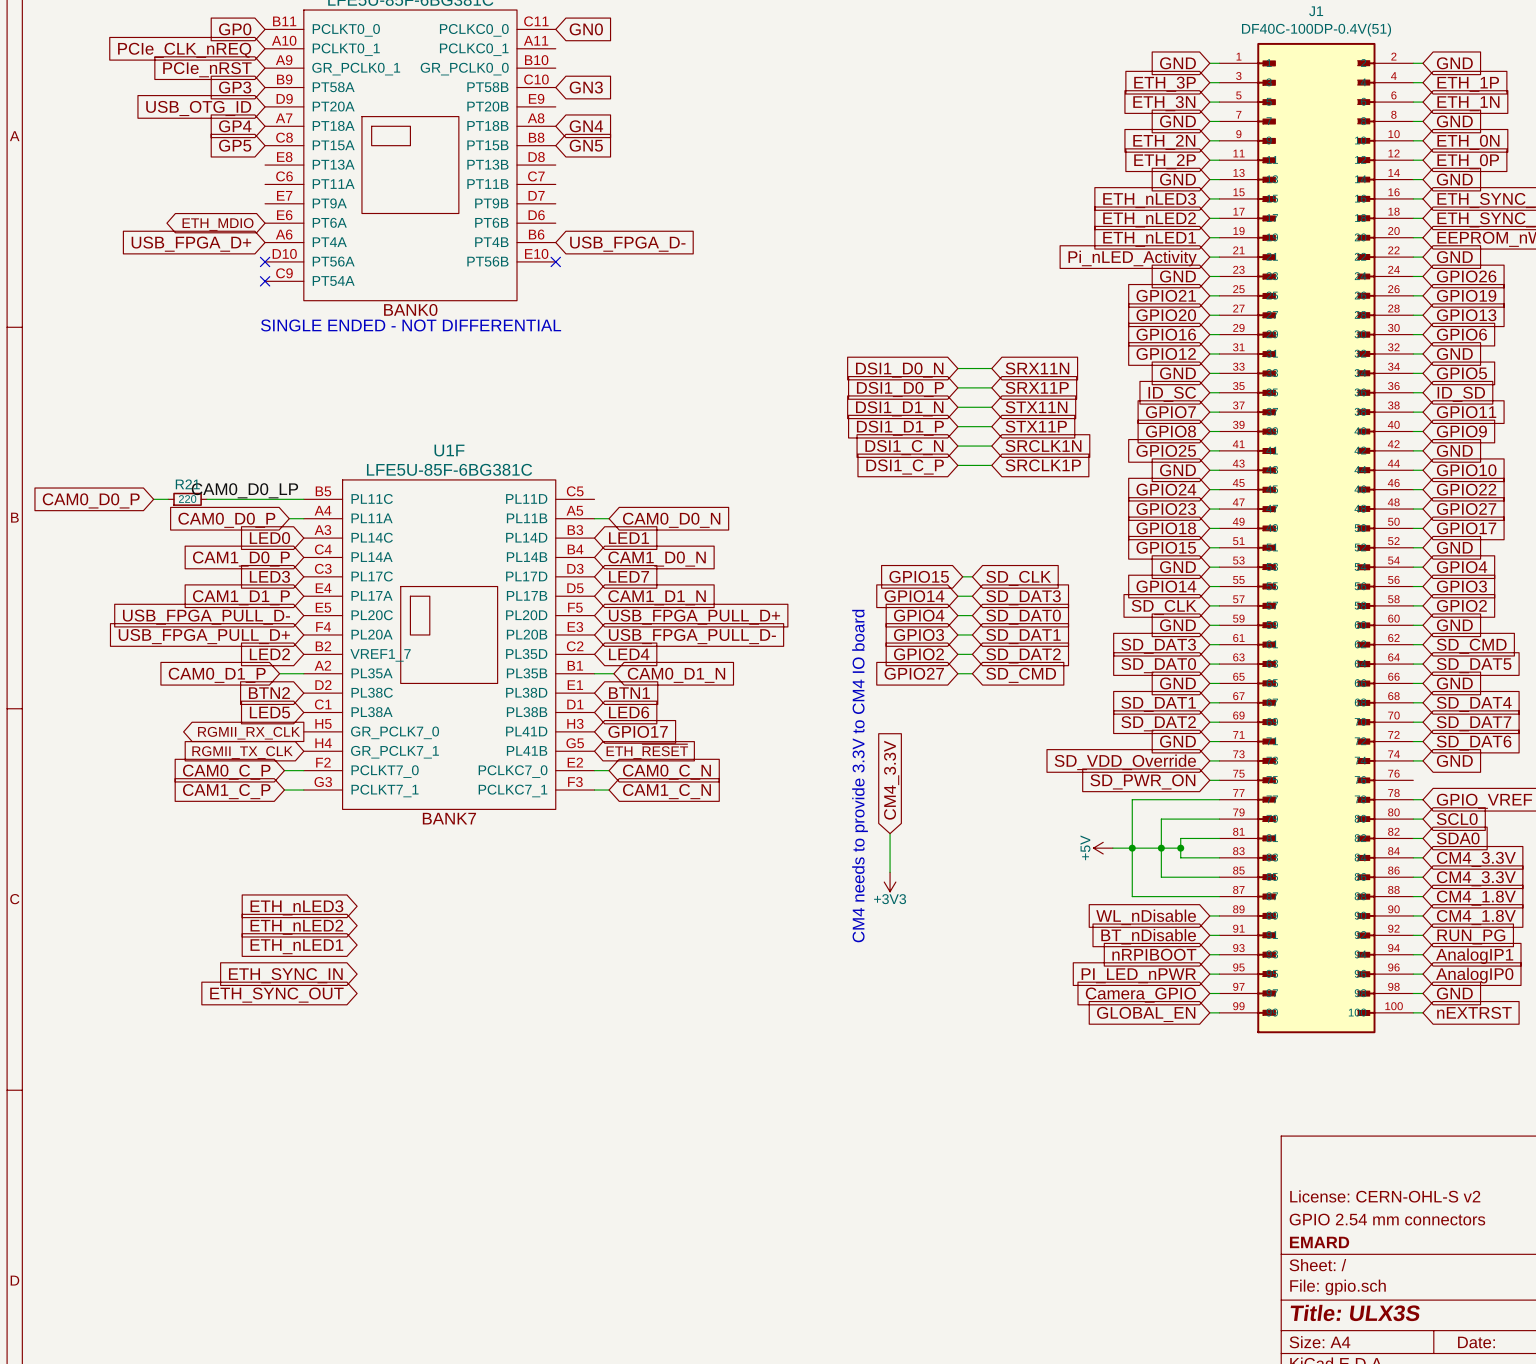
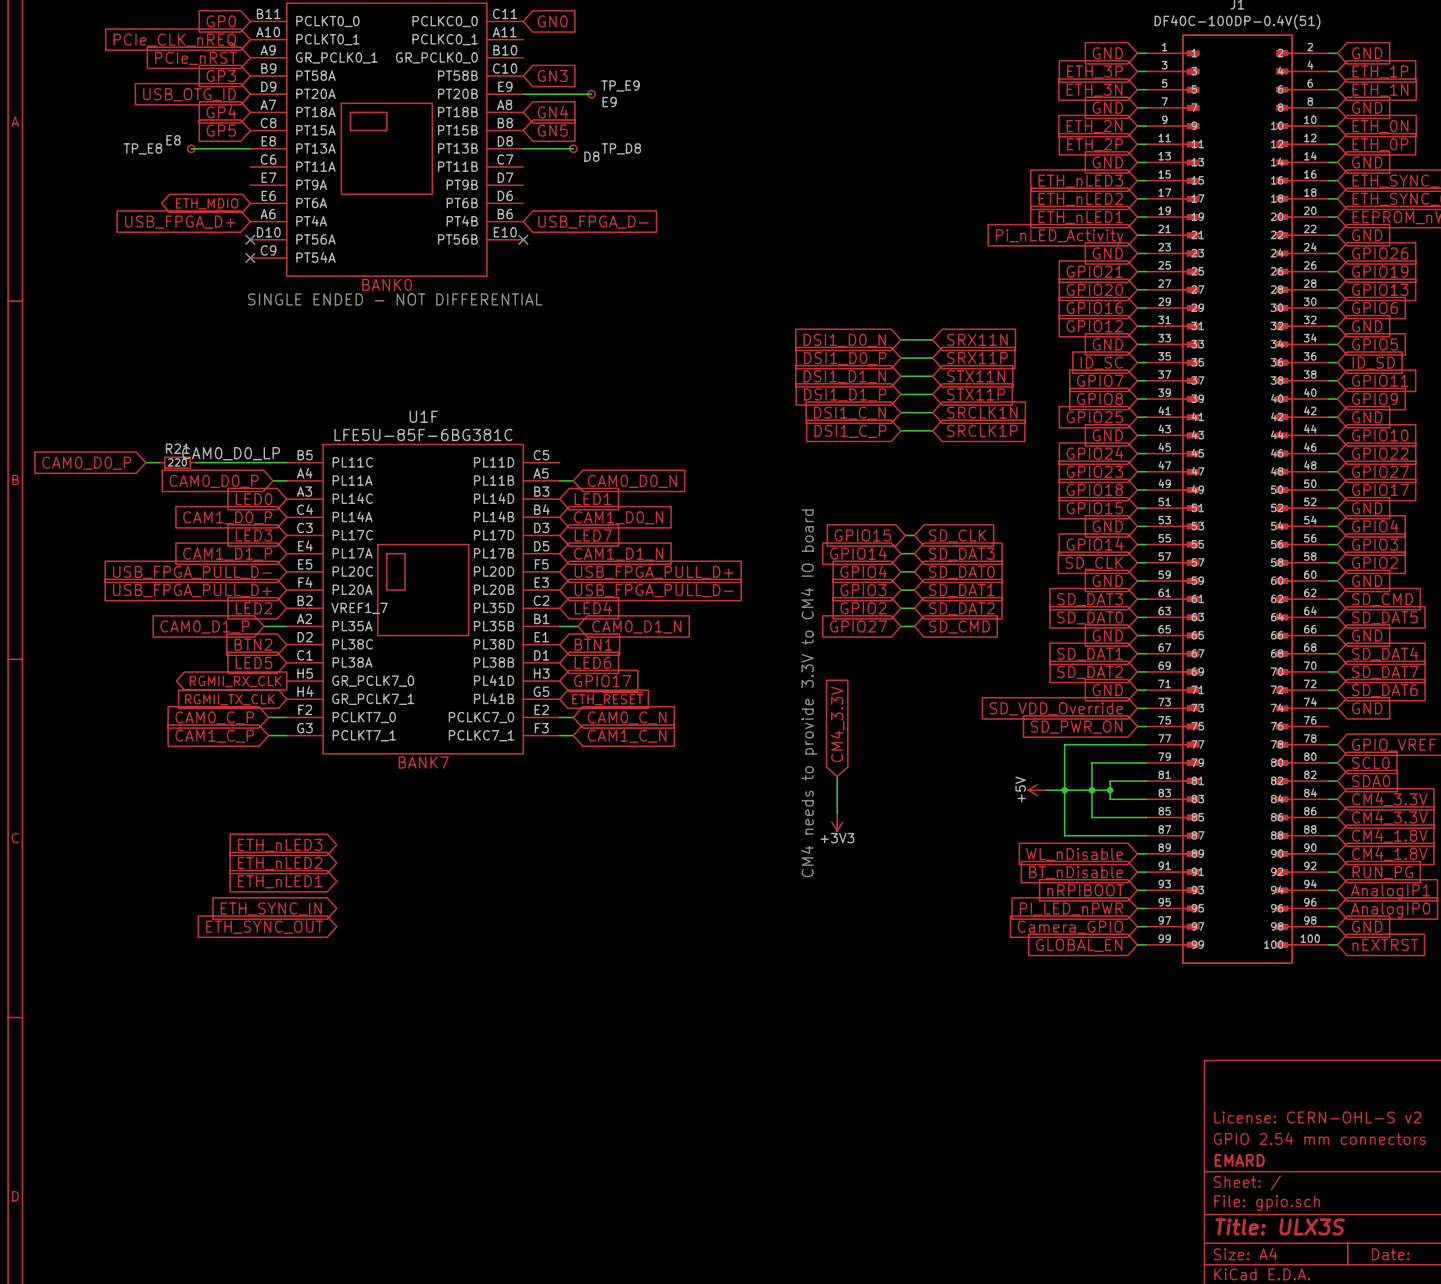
wire: none -> (523, 94) (591, 94)
TP_E9: none -> E9 (591, 94)
wire: none -> (191, 148) (250, 148)
TP_E8: none -> E8 (191, 148)
wire: none -> (523, 148) (573, 148)
TP_D8: none -> D8 (573, 148)

